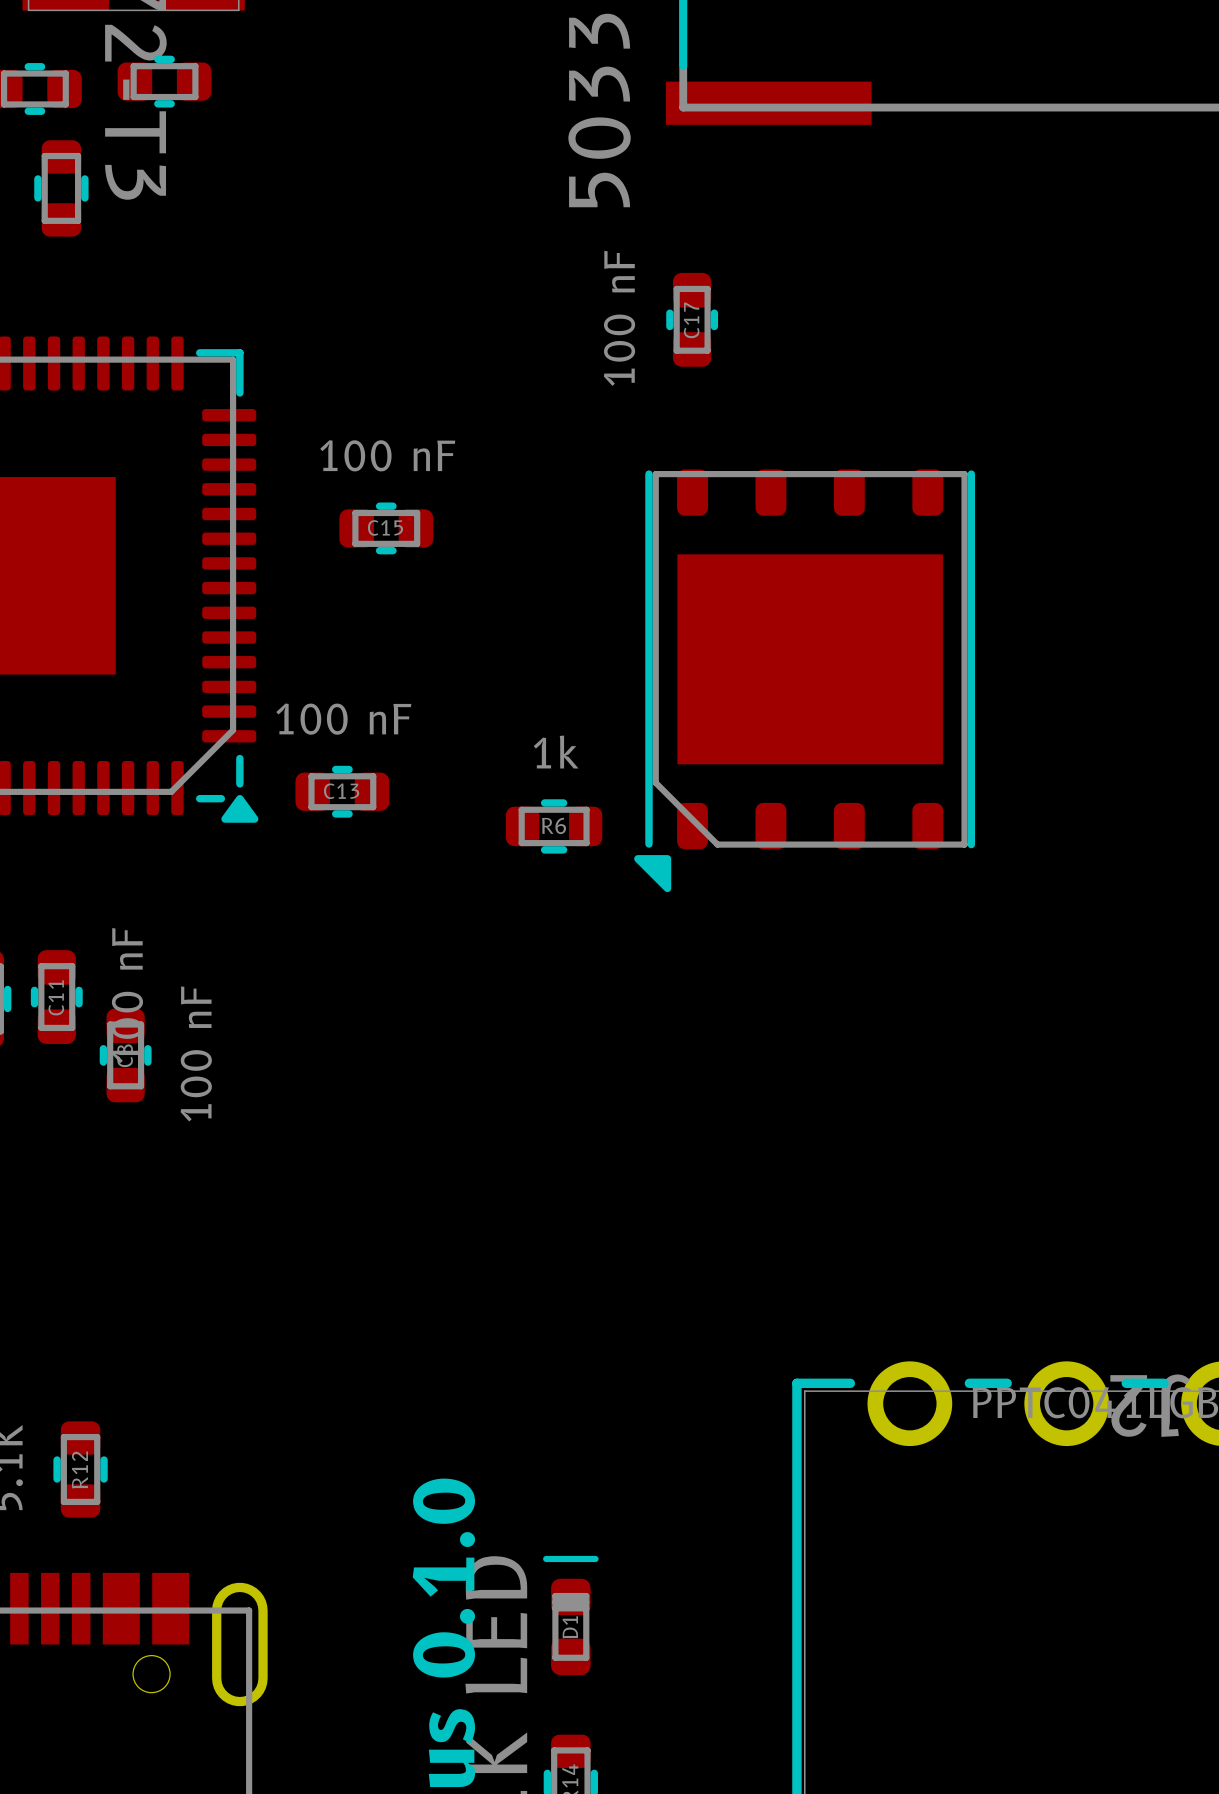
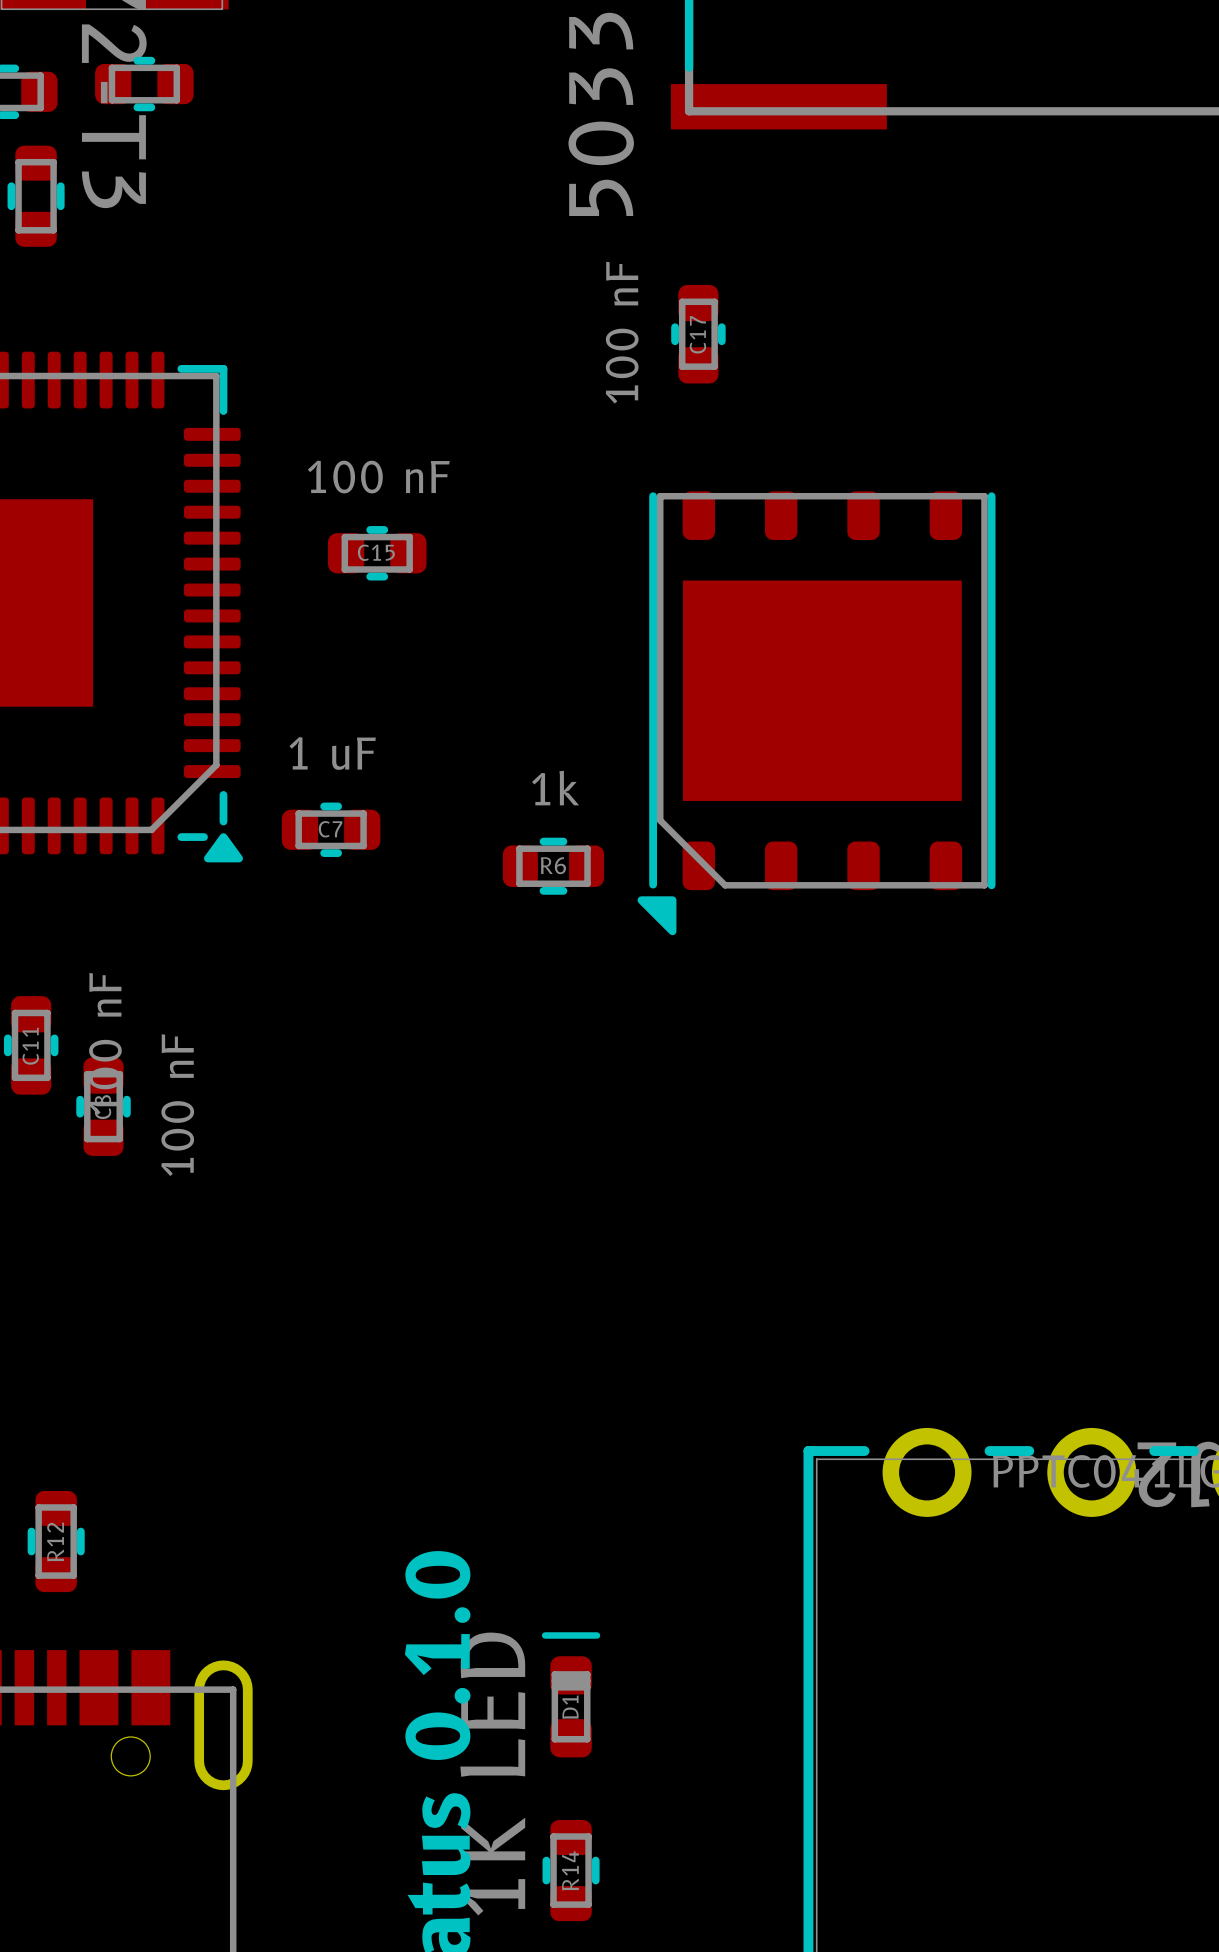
C13 value: 100 nF (343, 719) -> 1 uF (332, 753)
C13 name: C13 (341, 791) -> C7 (330, 829)

